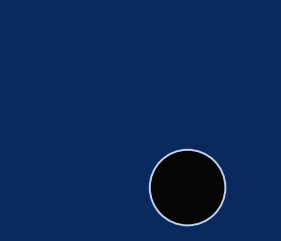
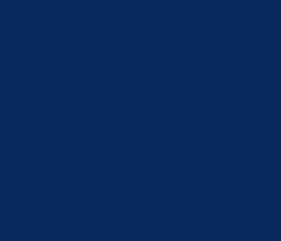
part: (187, 187) -> none

